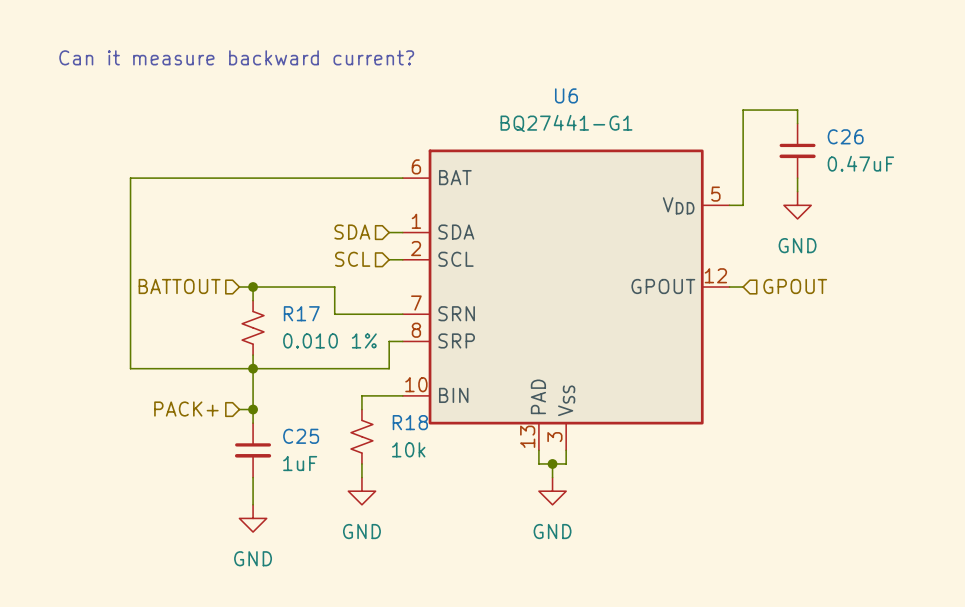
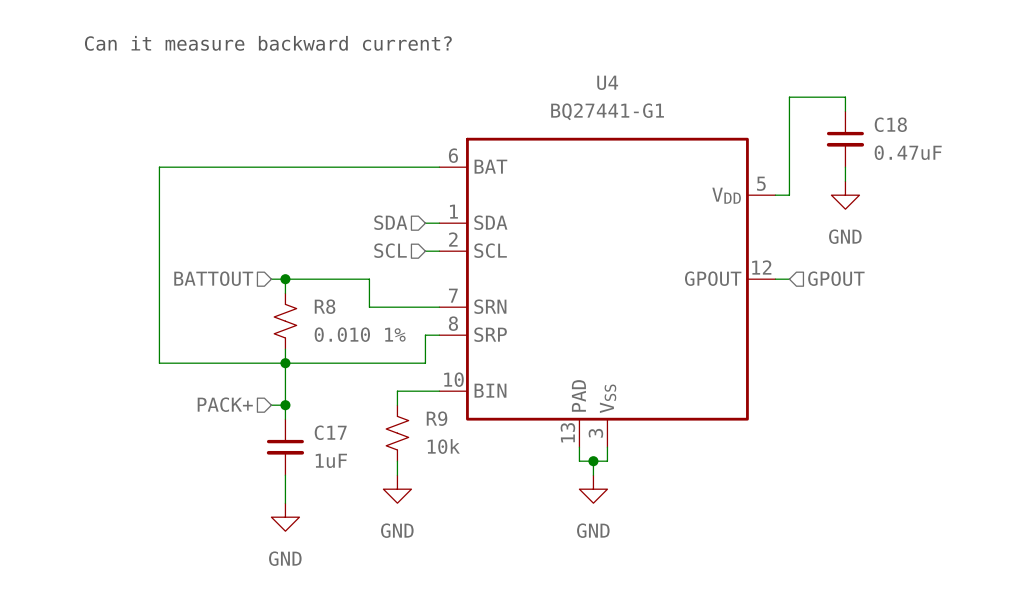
U6 name: U6 (566, 95) -> U4 (607, 82)
C26 name: C26 (845, 136) -> C18 (890, 124)
R17 name: R17 (301, 313) -> R8 (325, 306)
R18 name: R18 (410, 422) -> R9 (437, 418)
C25 name: C25 (301, 436) -> C17 (330, 432)

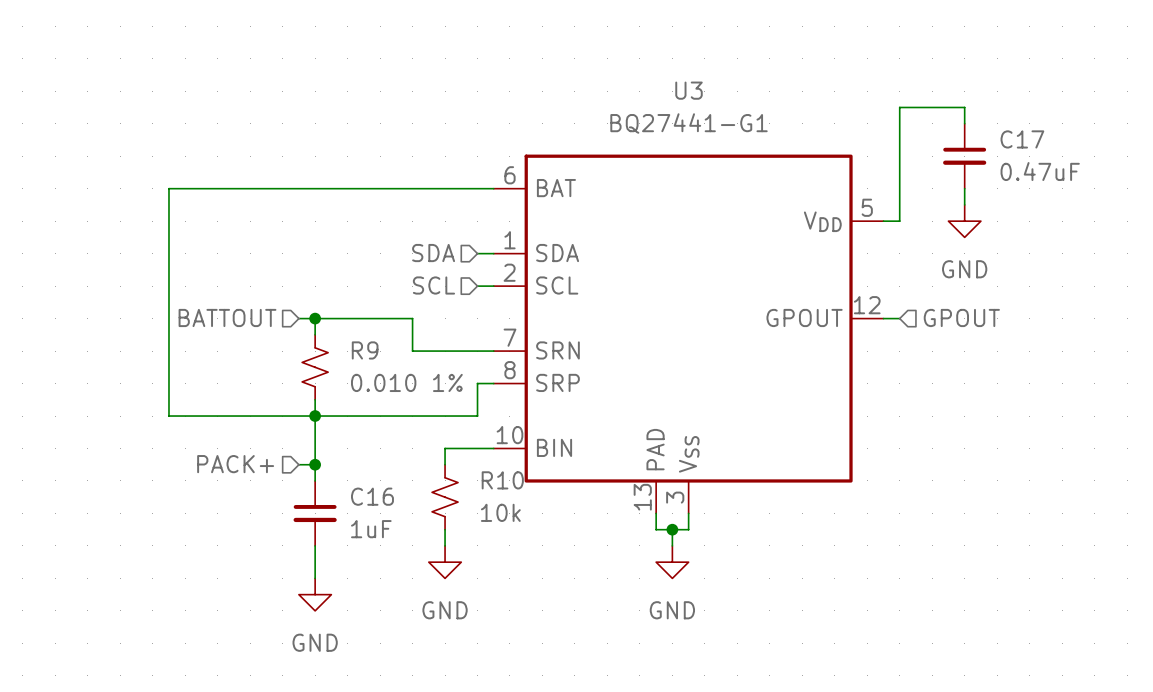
text: Can it measure backward current? (268, 43) -> none
U4 name: U4 (607, 82) -> U3 (689, 90)
C18 name: C18 (890, 124) -> C17 (1022, 139)
R8 name: R8 (325, 306) -> R9 (365, 350)
R9 name: R9 (437, 418) -> R10 (502, 480)
C17 name: C17 (330, 432) -> C16 (372, 496)

